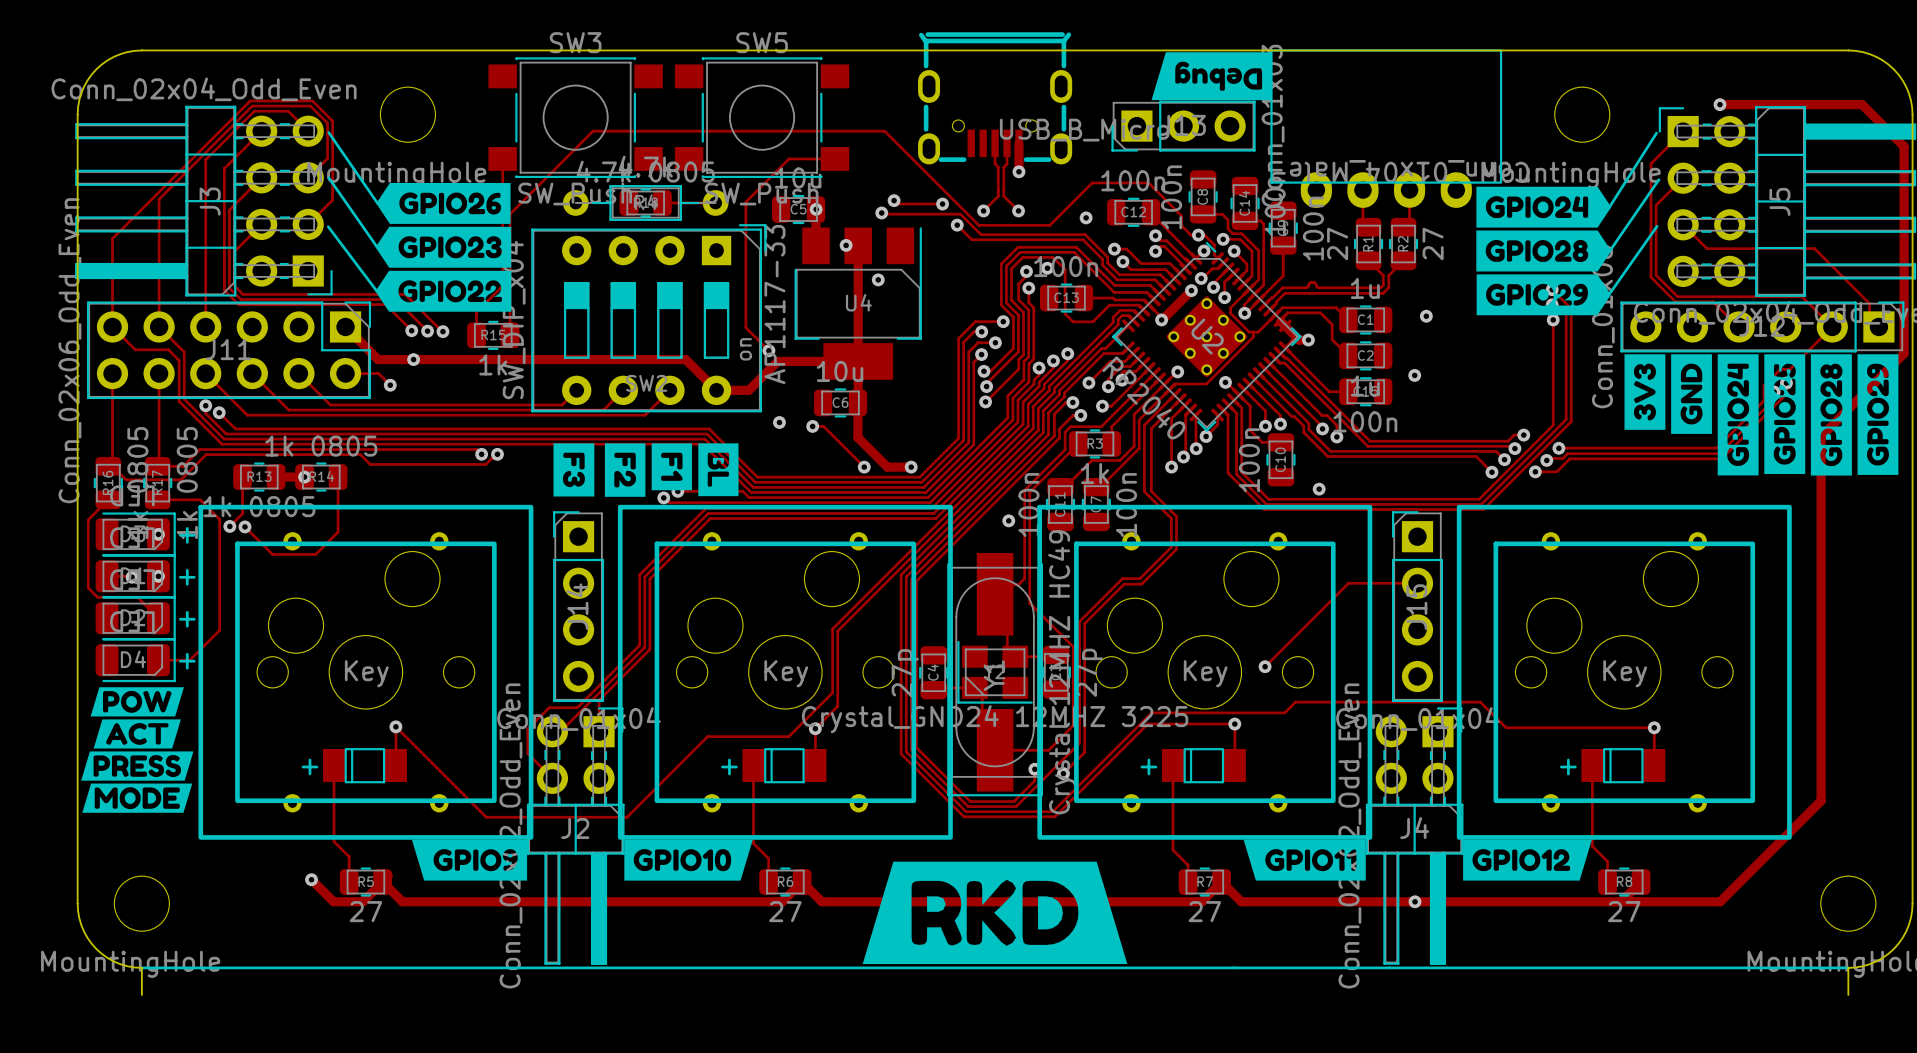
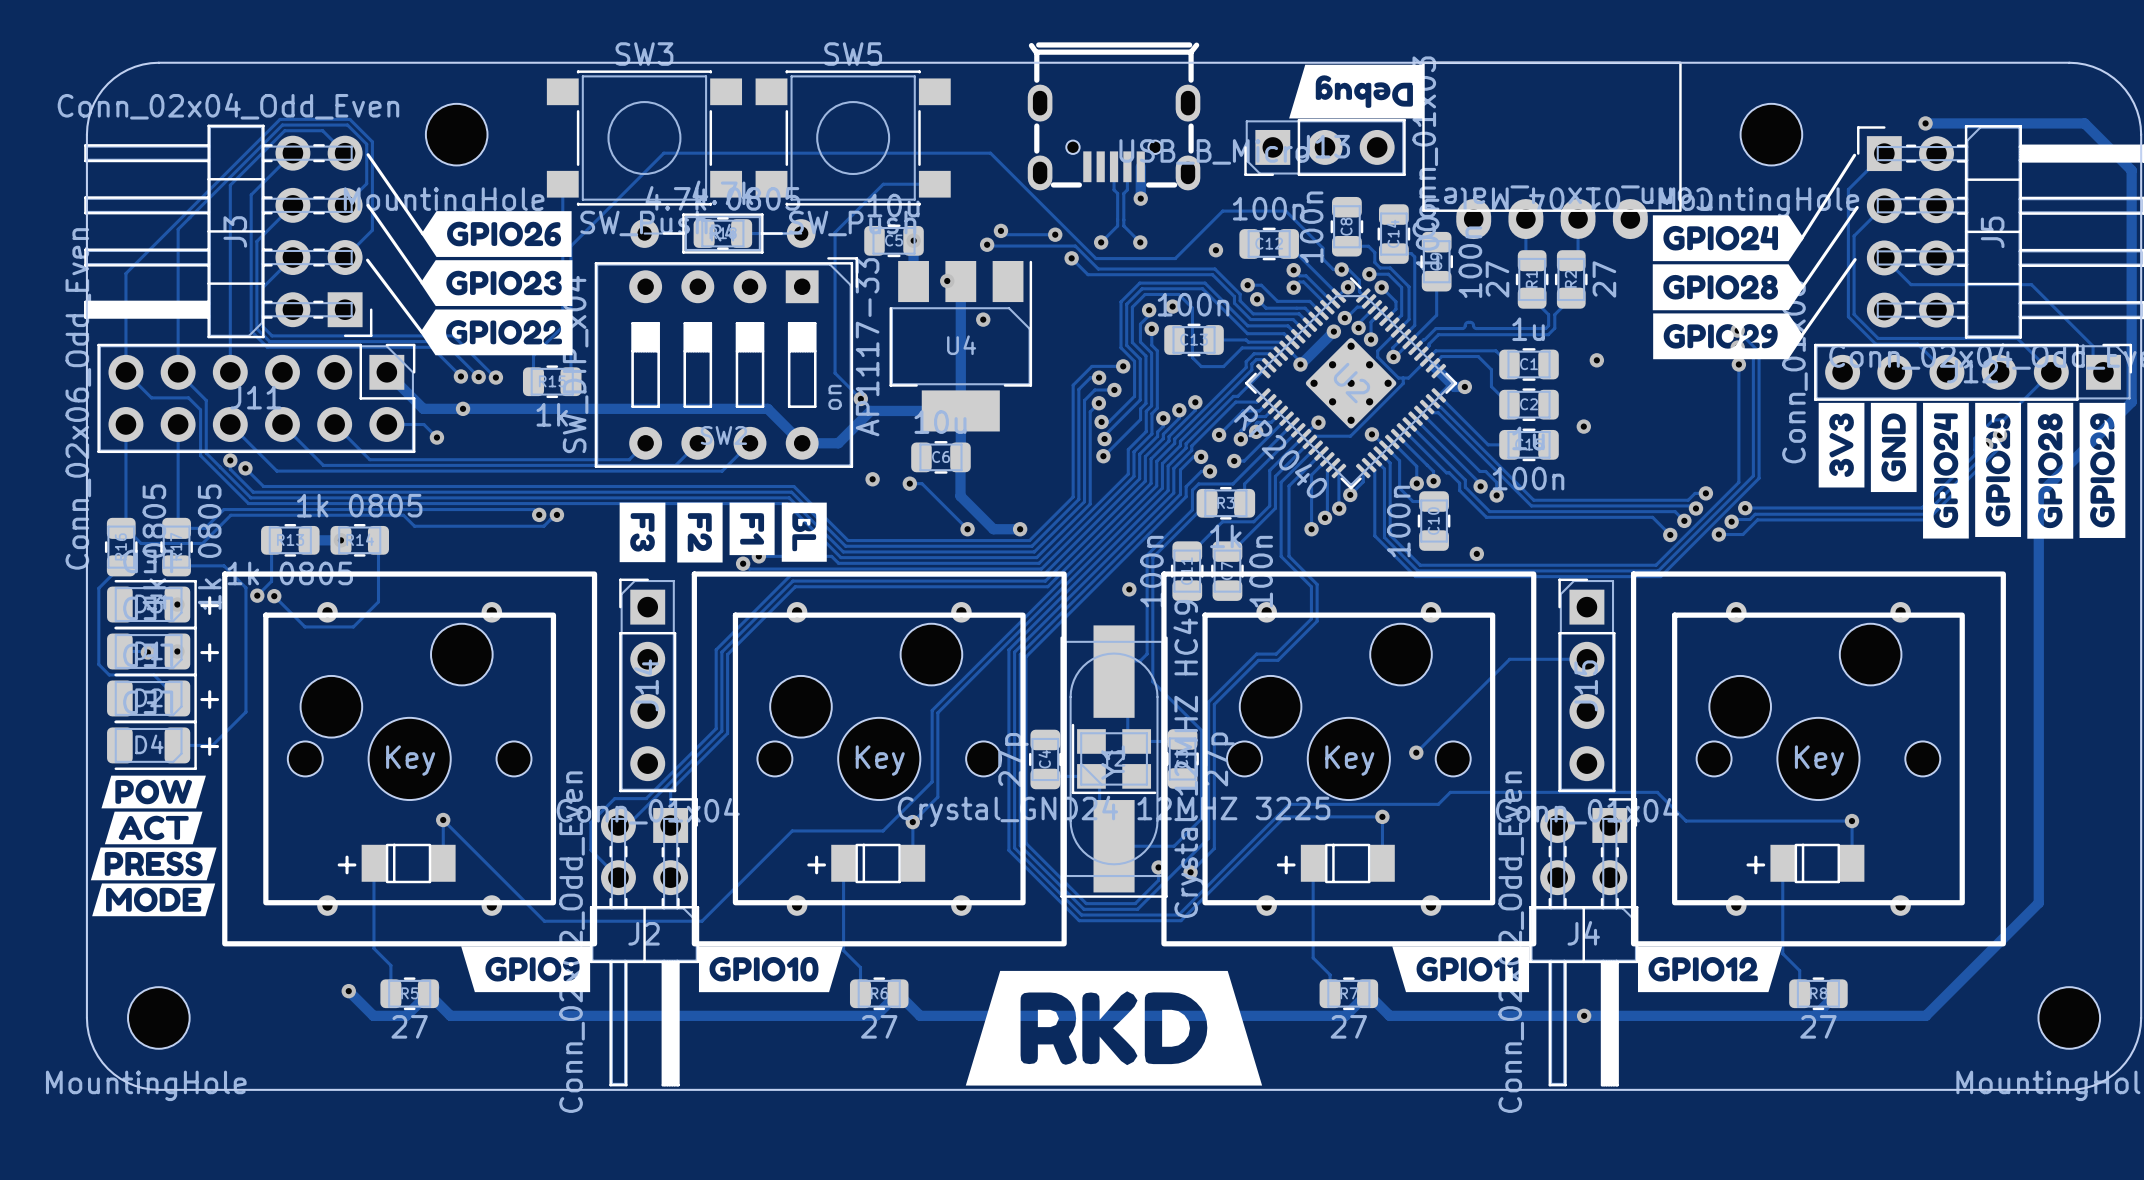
line: (141, 967) (1848, 967) -> none
board edge: (141, 967) (141, 994) -> (158, 1089) (2069, 1089)
board edge: (1848, 967) (1848, 994) -> none

